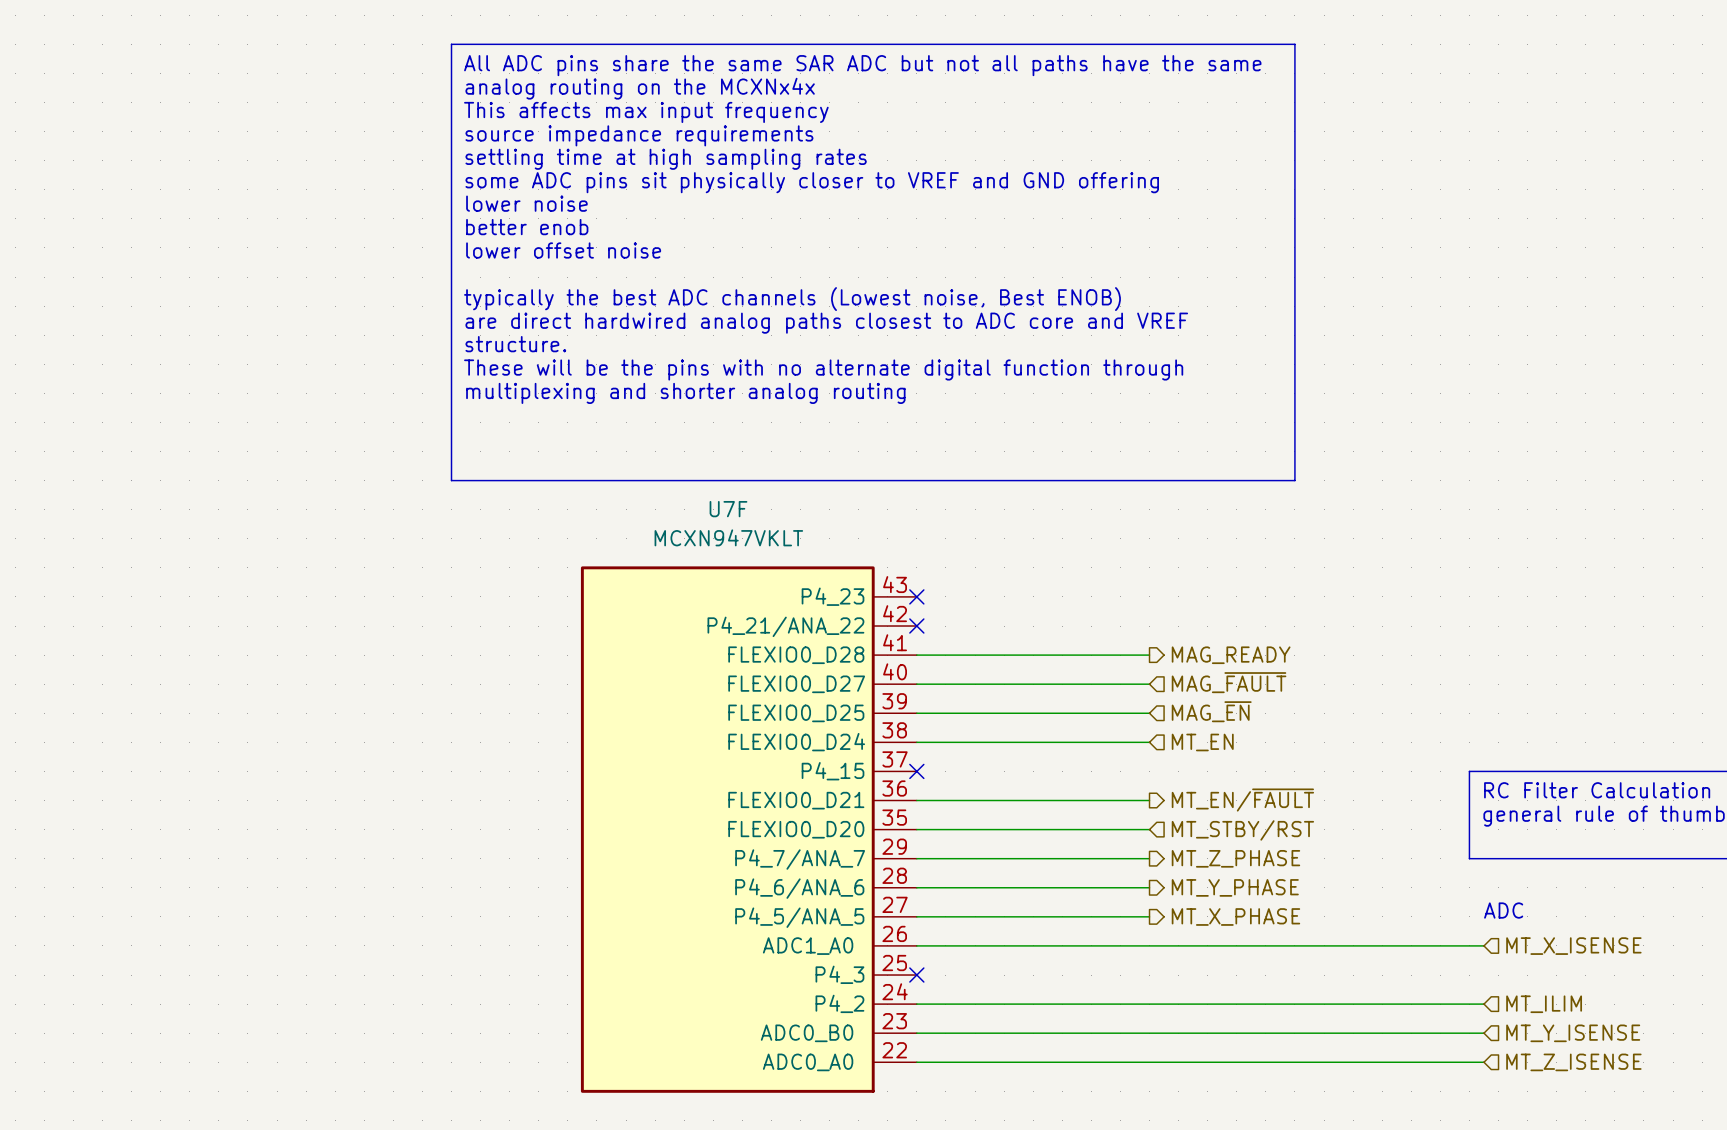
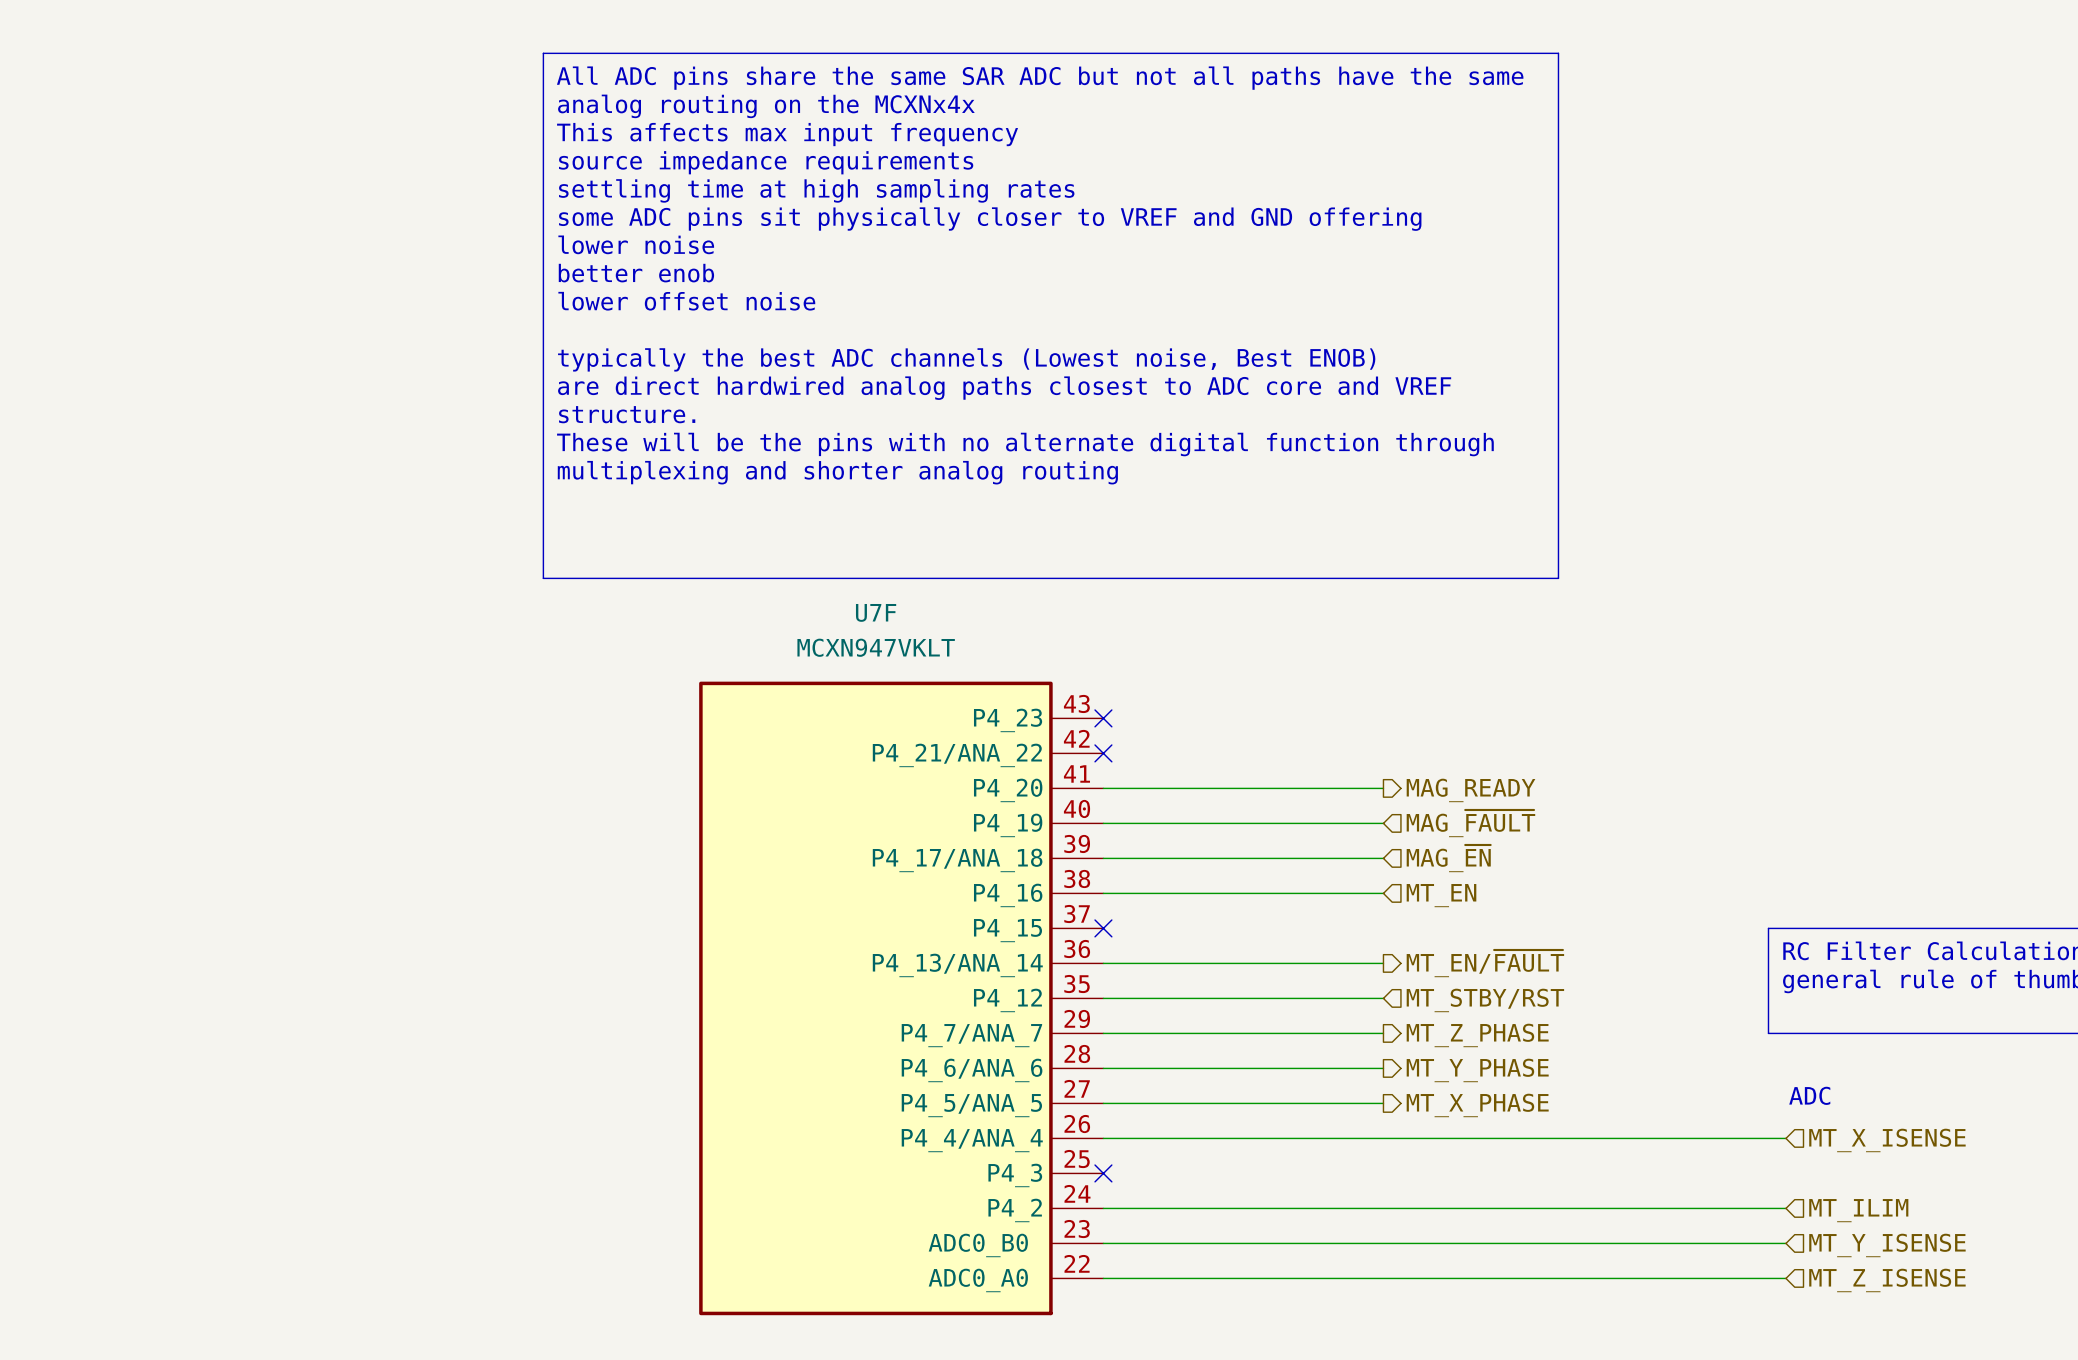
U7F pin name: FLEXIO0_D28 (796, 655) -> P4_20 (1008, 790)
U7F pin name: FLEXIO0_D27 (796, 684) -> P4_19 (1008, 825)
U7F pin name: FLEXIO0_D25 (796, 713) -> P4_17/ANA_18 (957, 860)
U7F pin name: FLEXIO0_D24 (796, 742) -> P4_16 (1008, 895)
U7F pin name: FLEXIO0_D21 (796, 800) -> P4_13/ANA_14 (957, 965)
U7F pin name: FLEXIO0_D20 (796, 829) -> P4_12 (1007, 1000)
U7F pin name: ADC1_A0 (808, 946) -> P4_4/ANA_4 (972, 1140)

